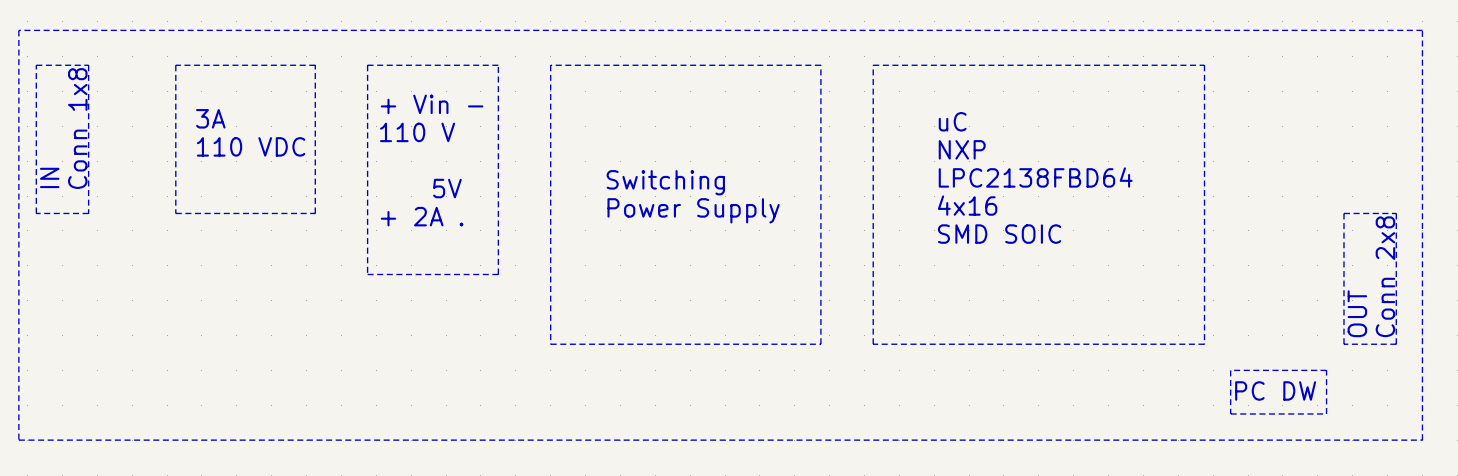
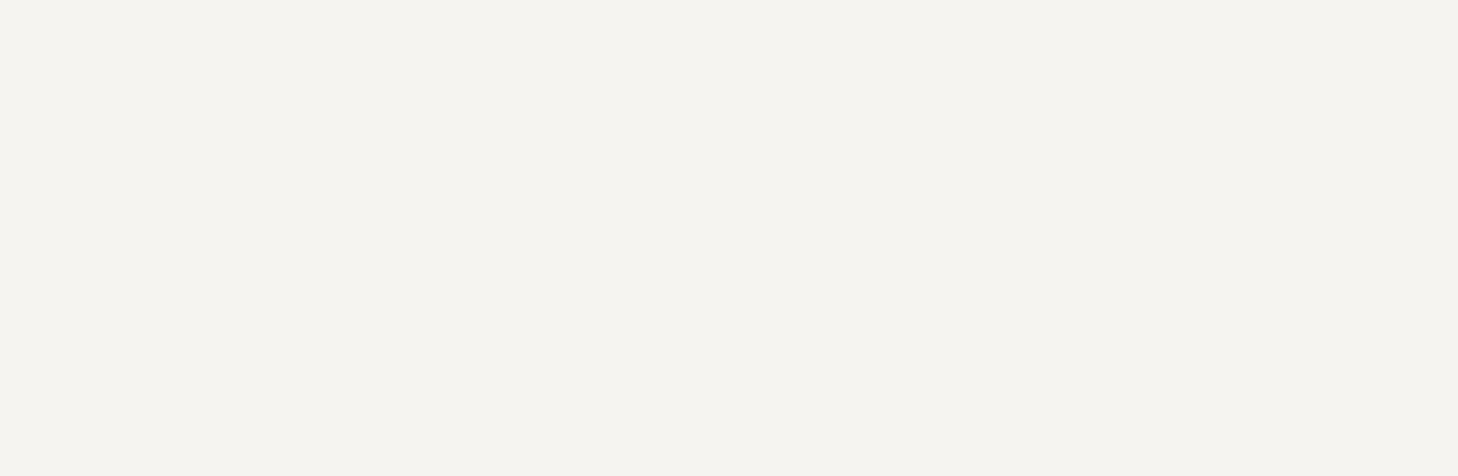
line: (18, 30) (1422, 30) (1422, 440) (18, 440) (18, 30) -> none
line: (36, 65) (88, 65) (88, 213) (36, 213) (36, 65) -> none
line: (175, 65) (175, 213) (315, 213) (315, 65) (175, 65) -> none
line: (367, 65) (498, 65) (498, 274) (367, 274) (367, 65) -> none
line: (550, 65) (820, 65) (820, 344) (550, 344) (550, 65) -> none
line: (873, 65) (1204, 65) (1204, 344) (873, 344) (873, 65) -> none
text: + Vin - (432, 104) -> none
text: 3A (210, 118) -> none
text: uC (952, 121) -> none
text: Conn 1x8 (77, 128) -> none
text: 110 V (417, 132) -> none
text: 110 VDC (251, 146) -> none
text: NXP (962, 149) -> none
text: IN (49, 177) -> none
text: LPC2138FBD64 (1035, 177) -> none
text: Switching (665, 182) -> none
text: 5V (447, 188) -> none
text: 4x16 (967, 205) -> none
text: Power Supply (693, 210) -> none
line: (1343, 213) (1396, 213) (1396, 344) (1343, 344) (1343, 213) -> none
text: + 2A . (422, 216) -> none
text: SMD SOIC (999, 234) -> none
text: Conn 2x8 (1385, 276) -> none
text: OUT (1357, 313) -> none
line: (1230, 370) (1326, 370) (1326, 413) (1230, 413) (1230, 370) -> none
text: PC DW (1275, 390) -> none

